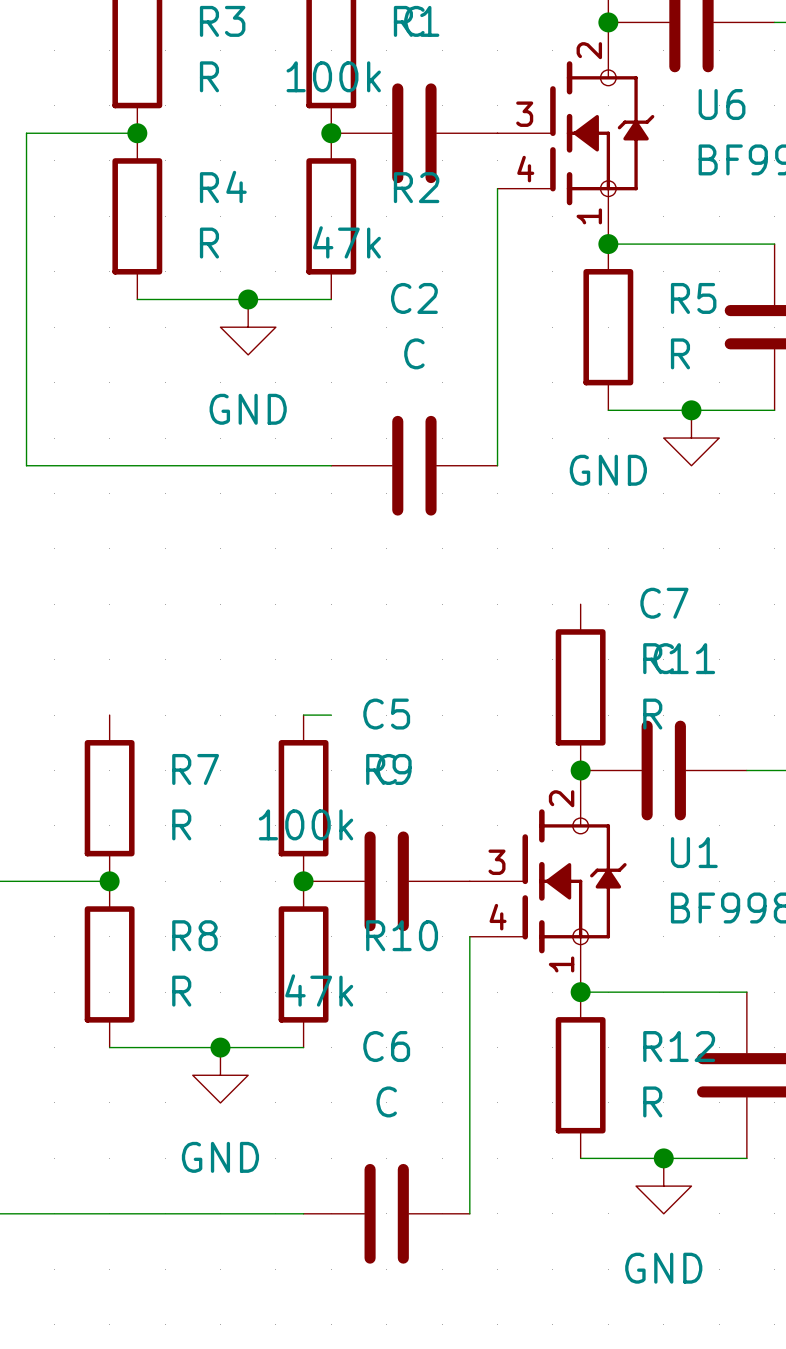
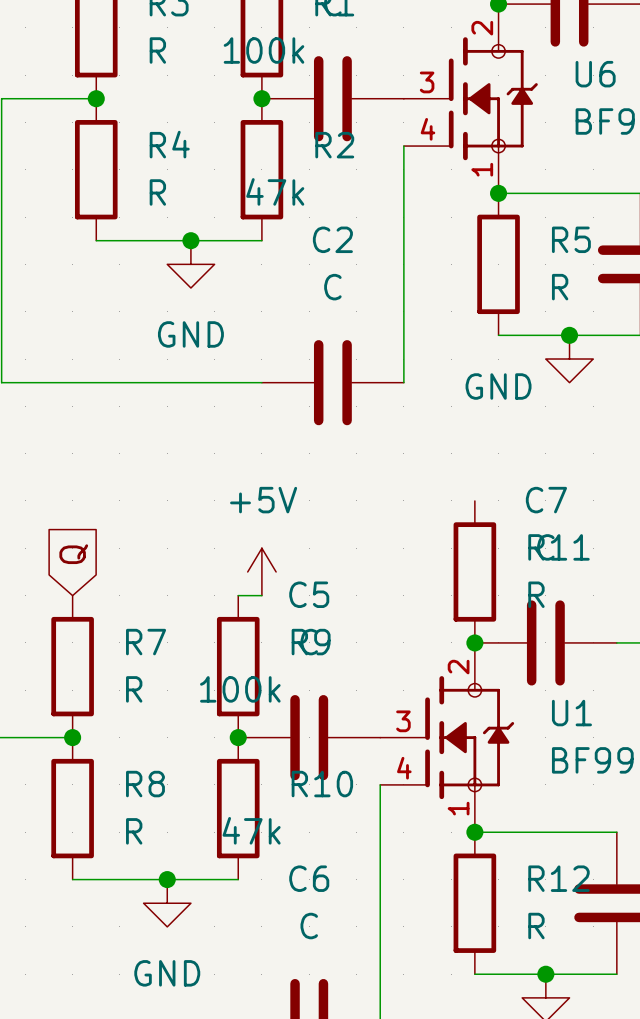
global label: none -> Q (73, 554)
power symbol: none -> +5V (261, 571)

